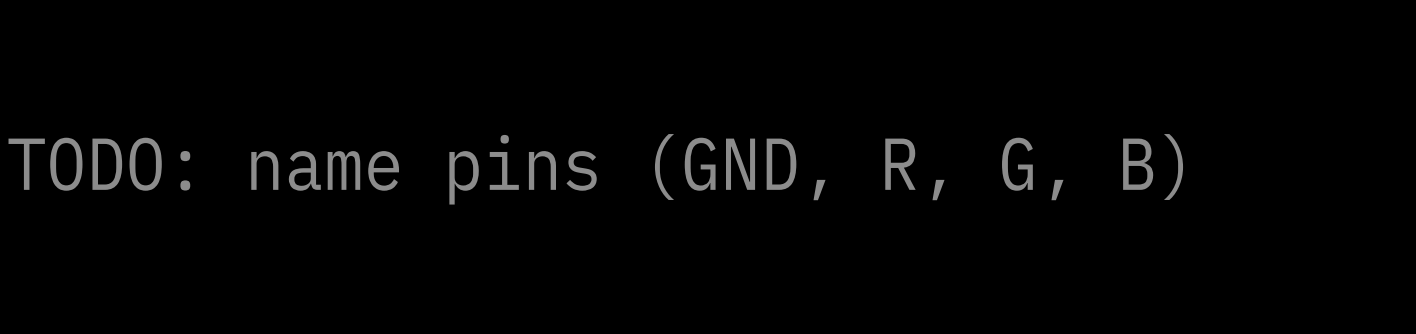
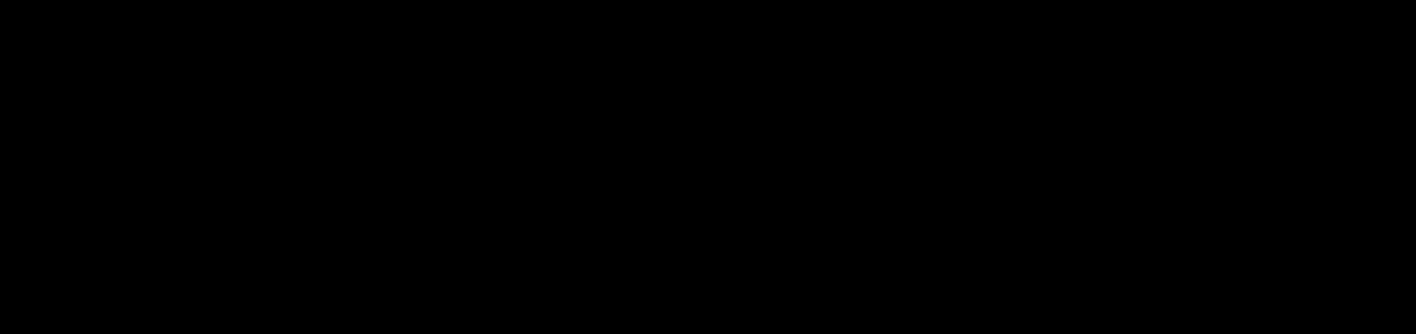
text: TODO: name pins (GND, R, G, B) (595, 169) -> none

